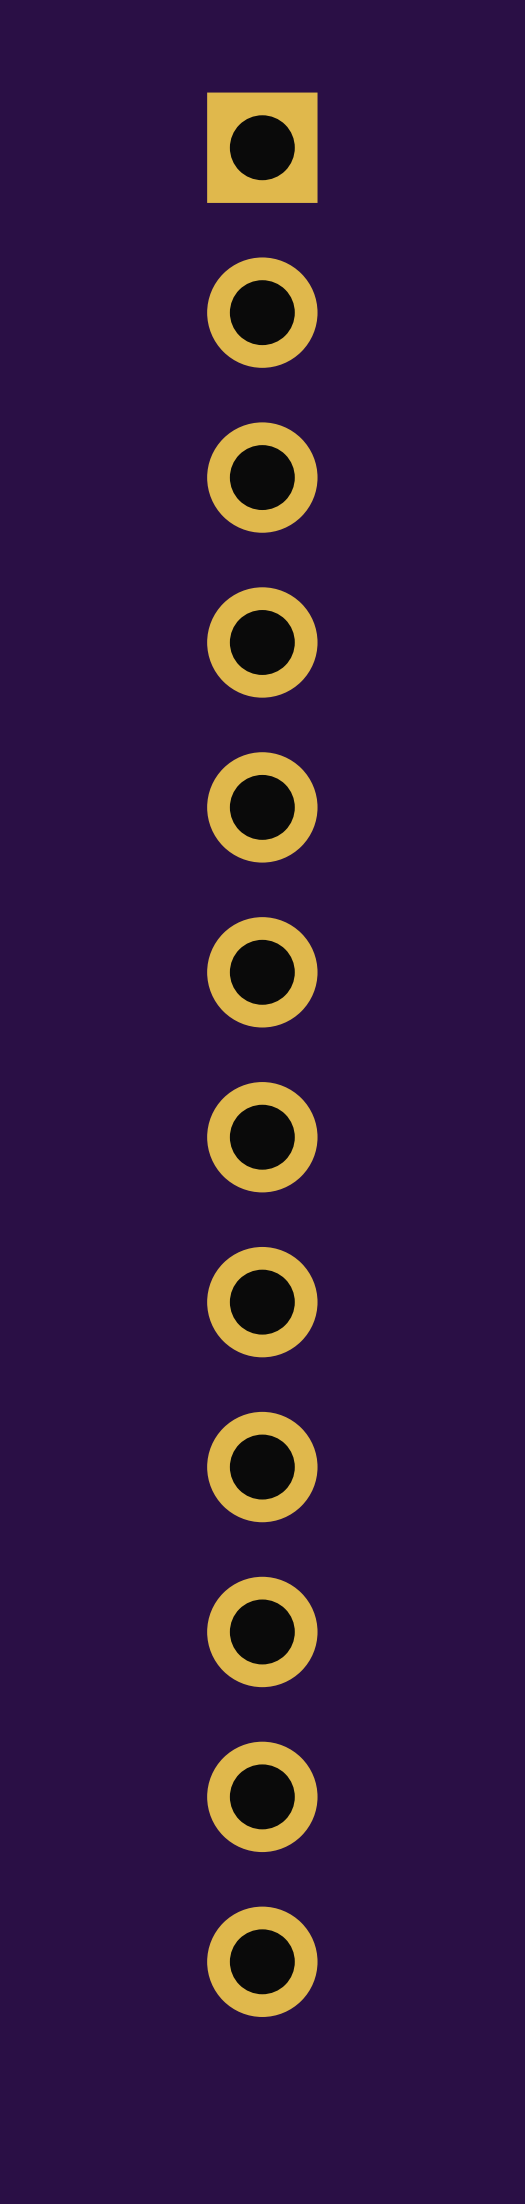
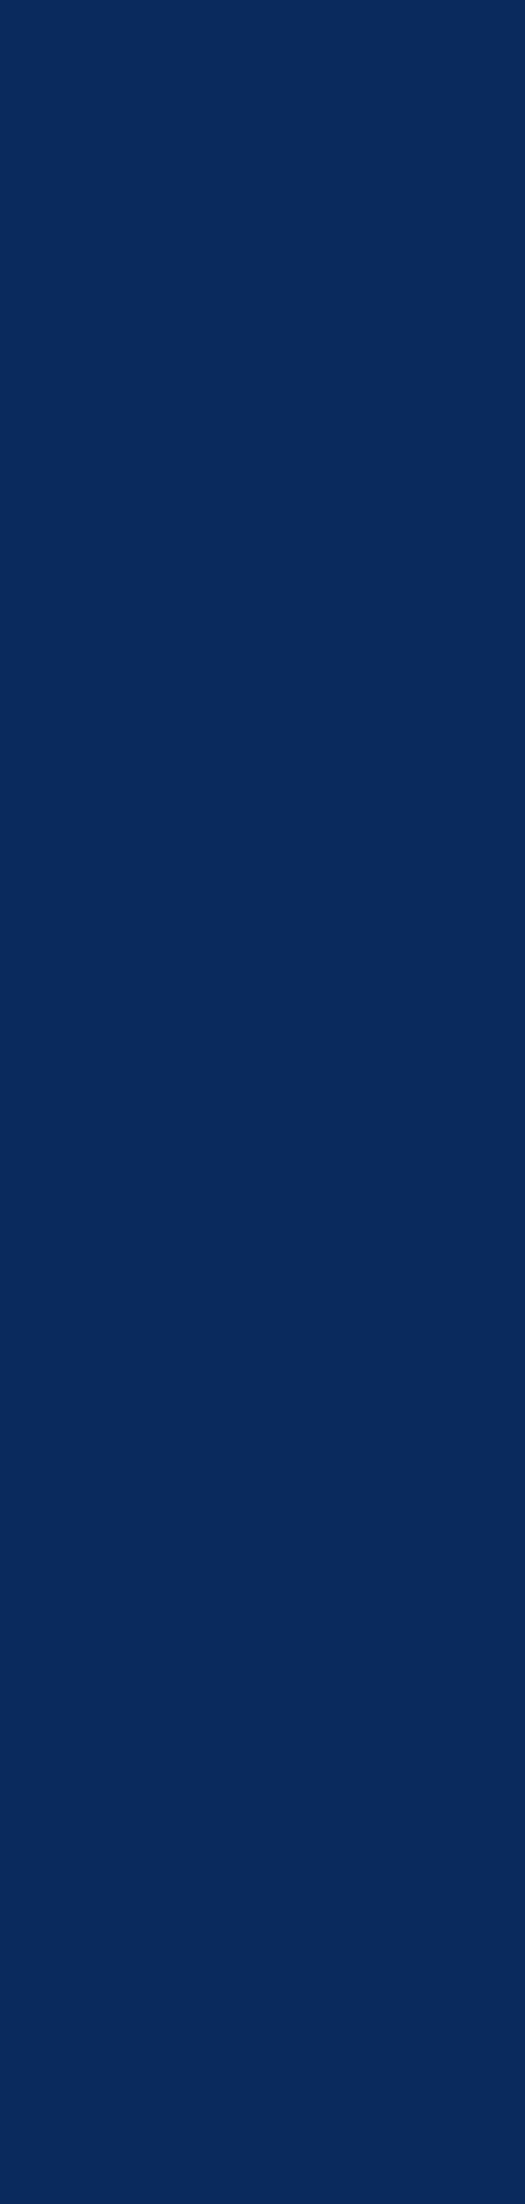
part: (262, 1054) -> none

